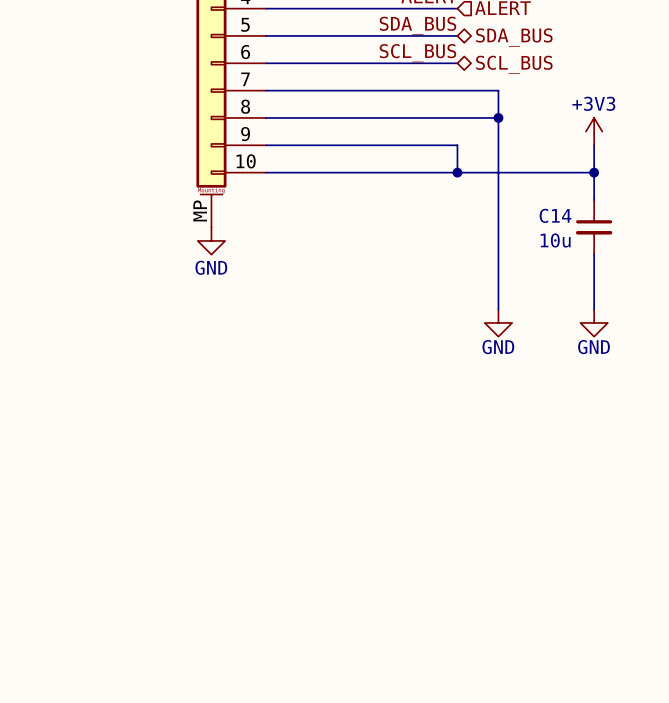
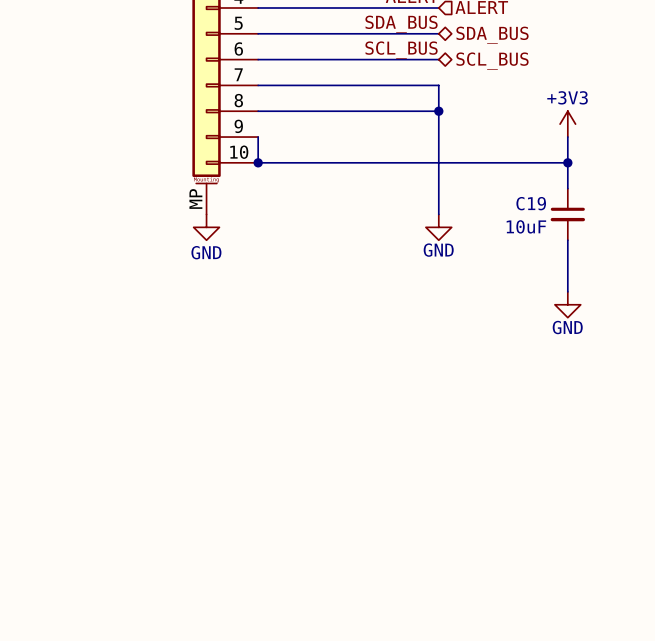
wire: (457, 90) (498, 90) (498, 309) -> (438, 85) (438, 137)
wire: (457, 117) (498, 117) -> none
junction: none -> (438, 111)
junction: (498, 117) -> none
wire: (266, 145) (457, 145) -> (258, 137) (258, 162)
junction: none -> (258, 162)
wire: none -> (438, 162) (438, 214)
junction: (457, 172) -> none
C14 name: C14 (555, 215) -> C19 (531, 203)
C14 value: 10u (555, 240) -> 10uF (526, 226)
power symbol position: GND (498, 322) -> GND (438, 227)

